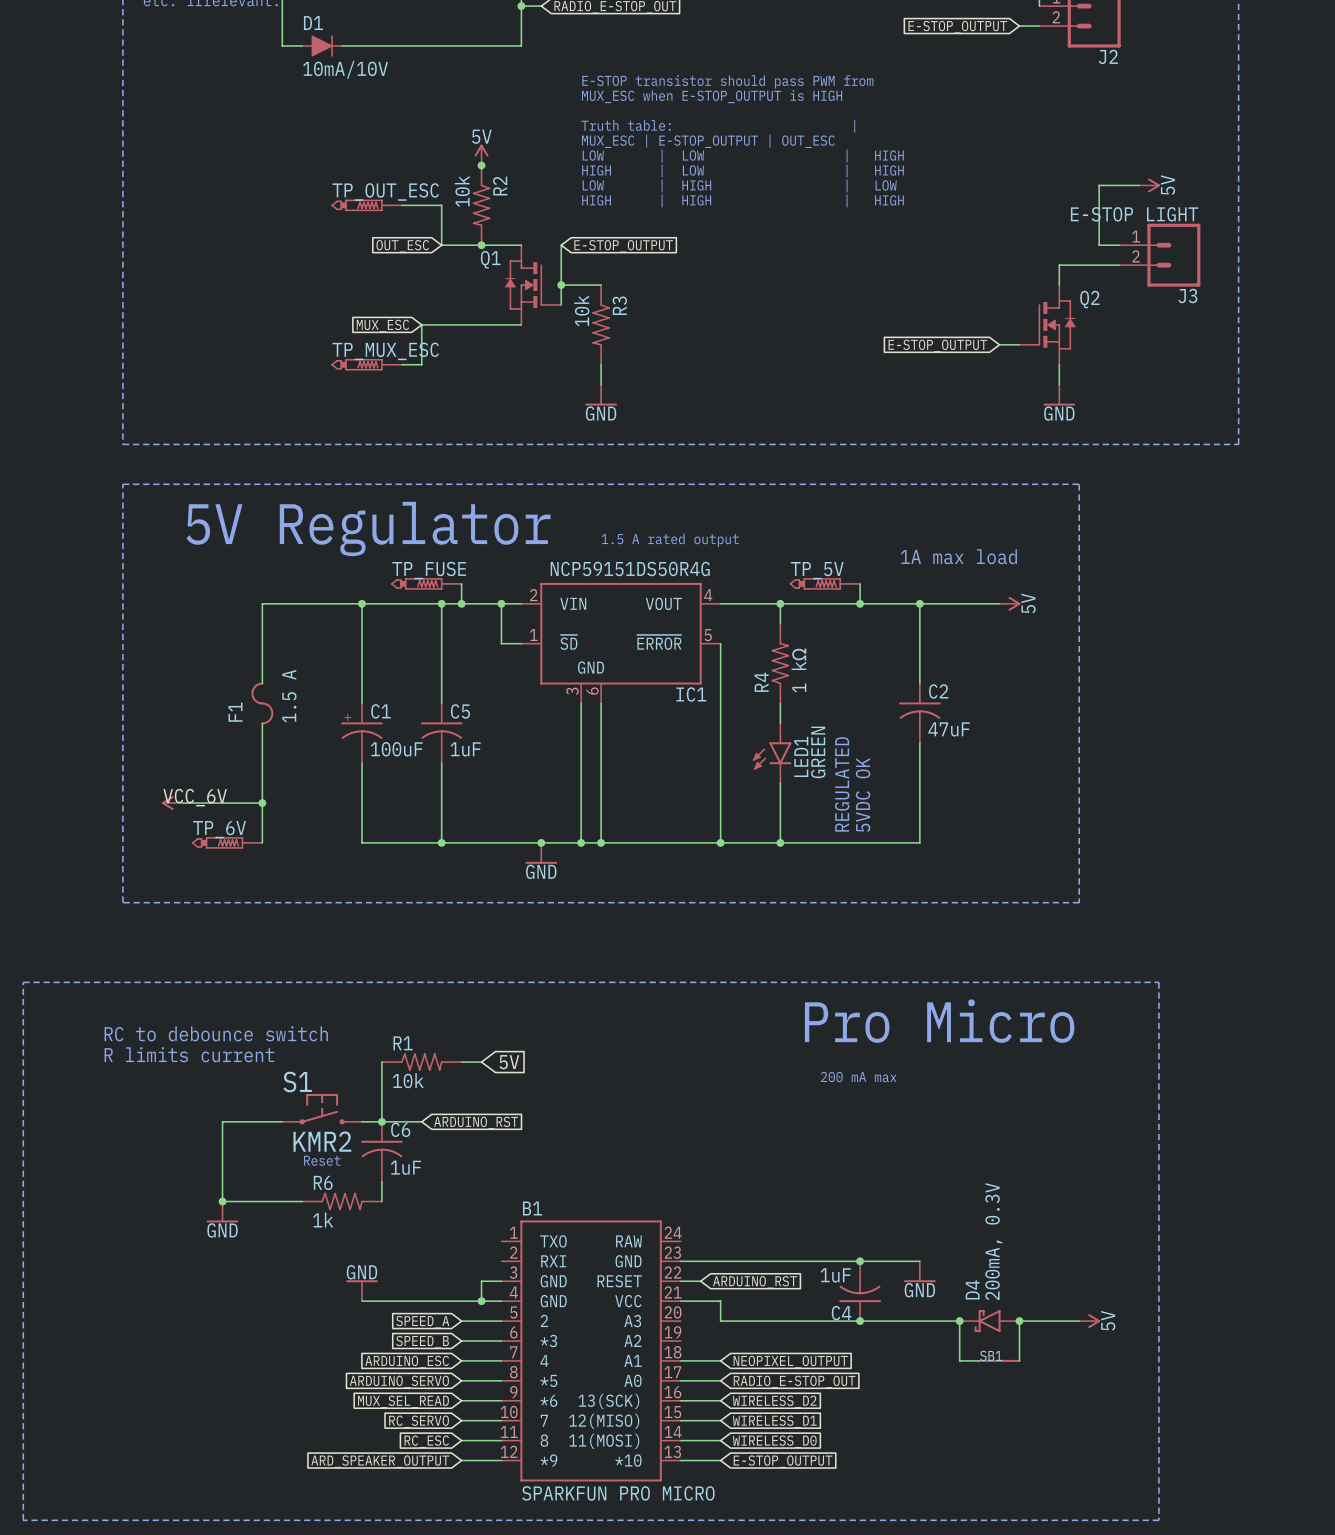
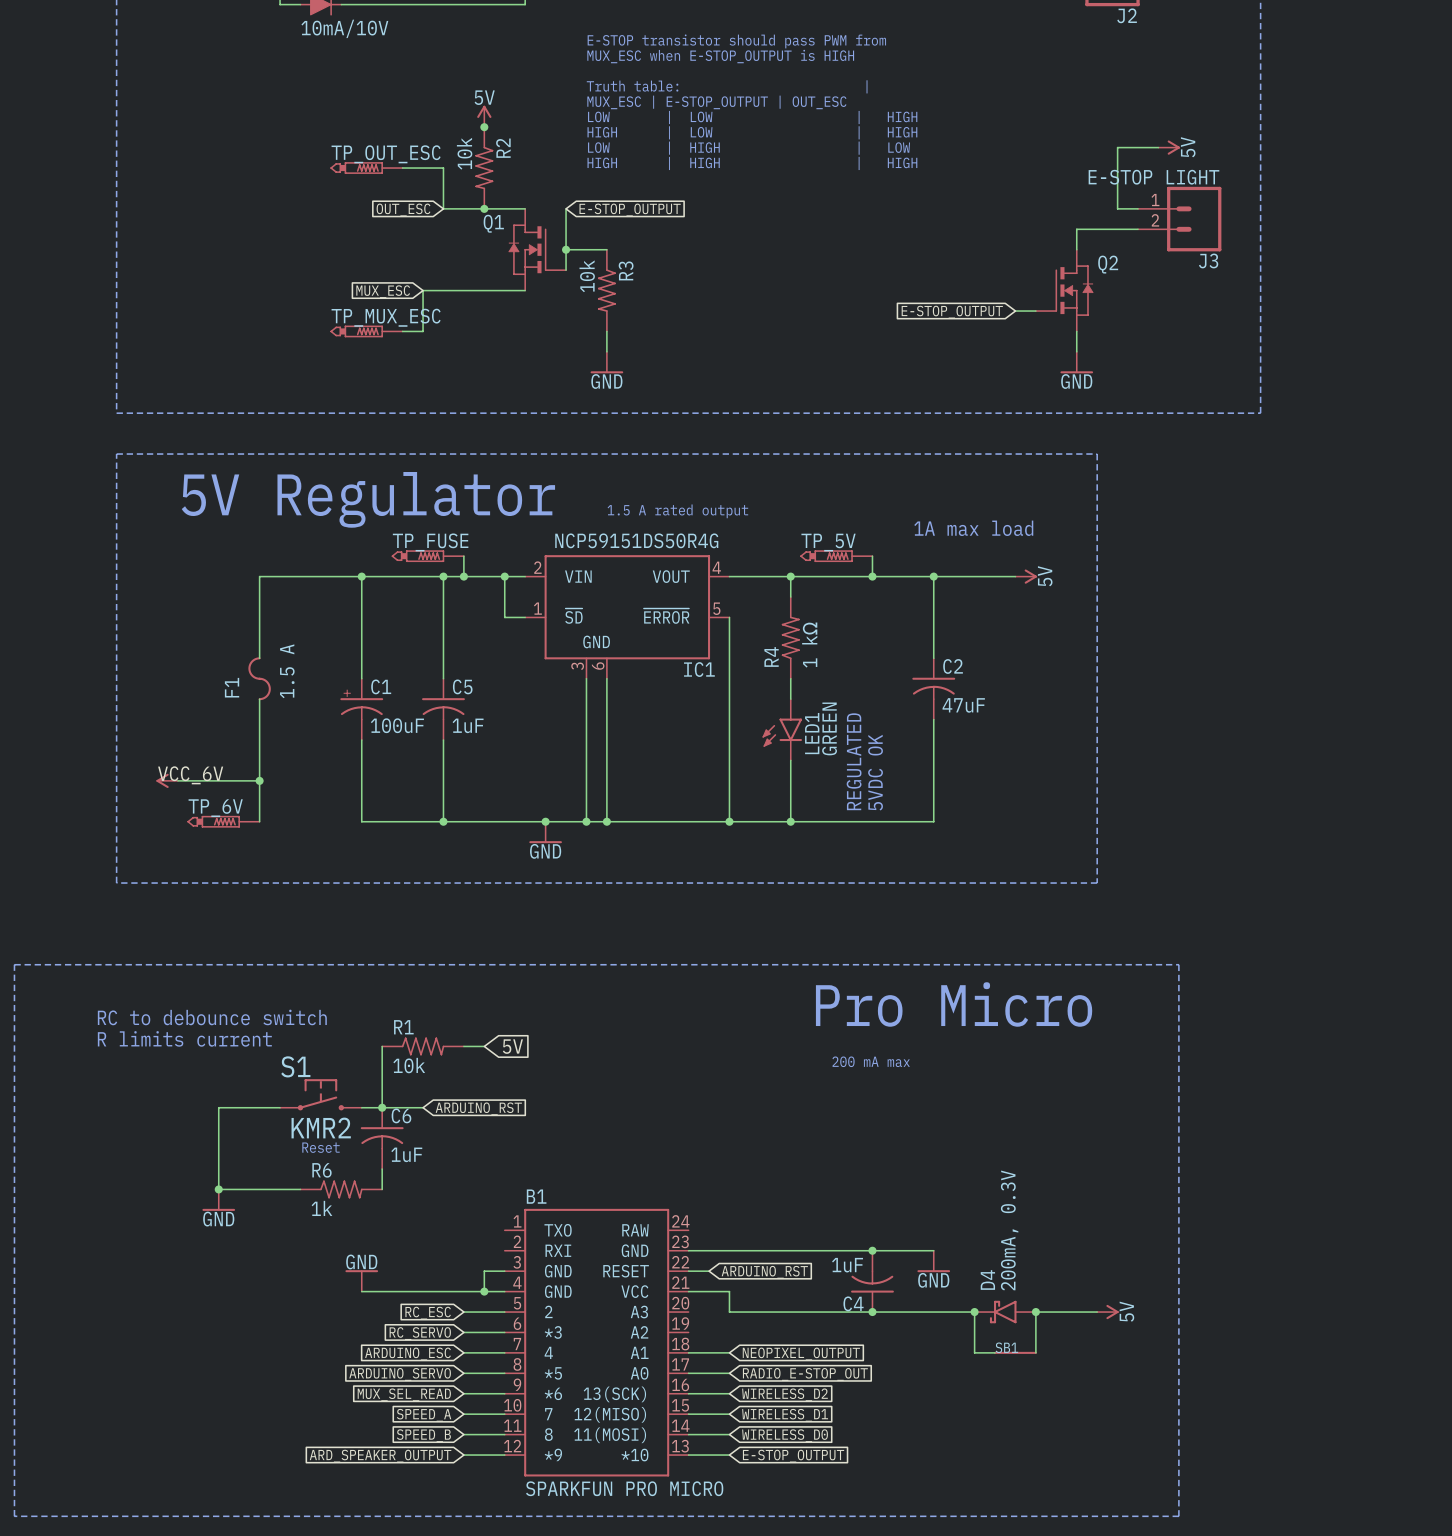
global label: SPEED_A (422, 1322) -> RC_ESC (428, 1313)
global label: SPEED_B (422, 1342) -> RC_SERVO (420, 1333)
global label: RC_SERVO (419, 1421) -> SPEED_A (424, 1415)
global label: RC_ESC (426, 1441) -> SPEED_B (423, 1435)

